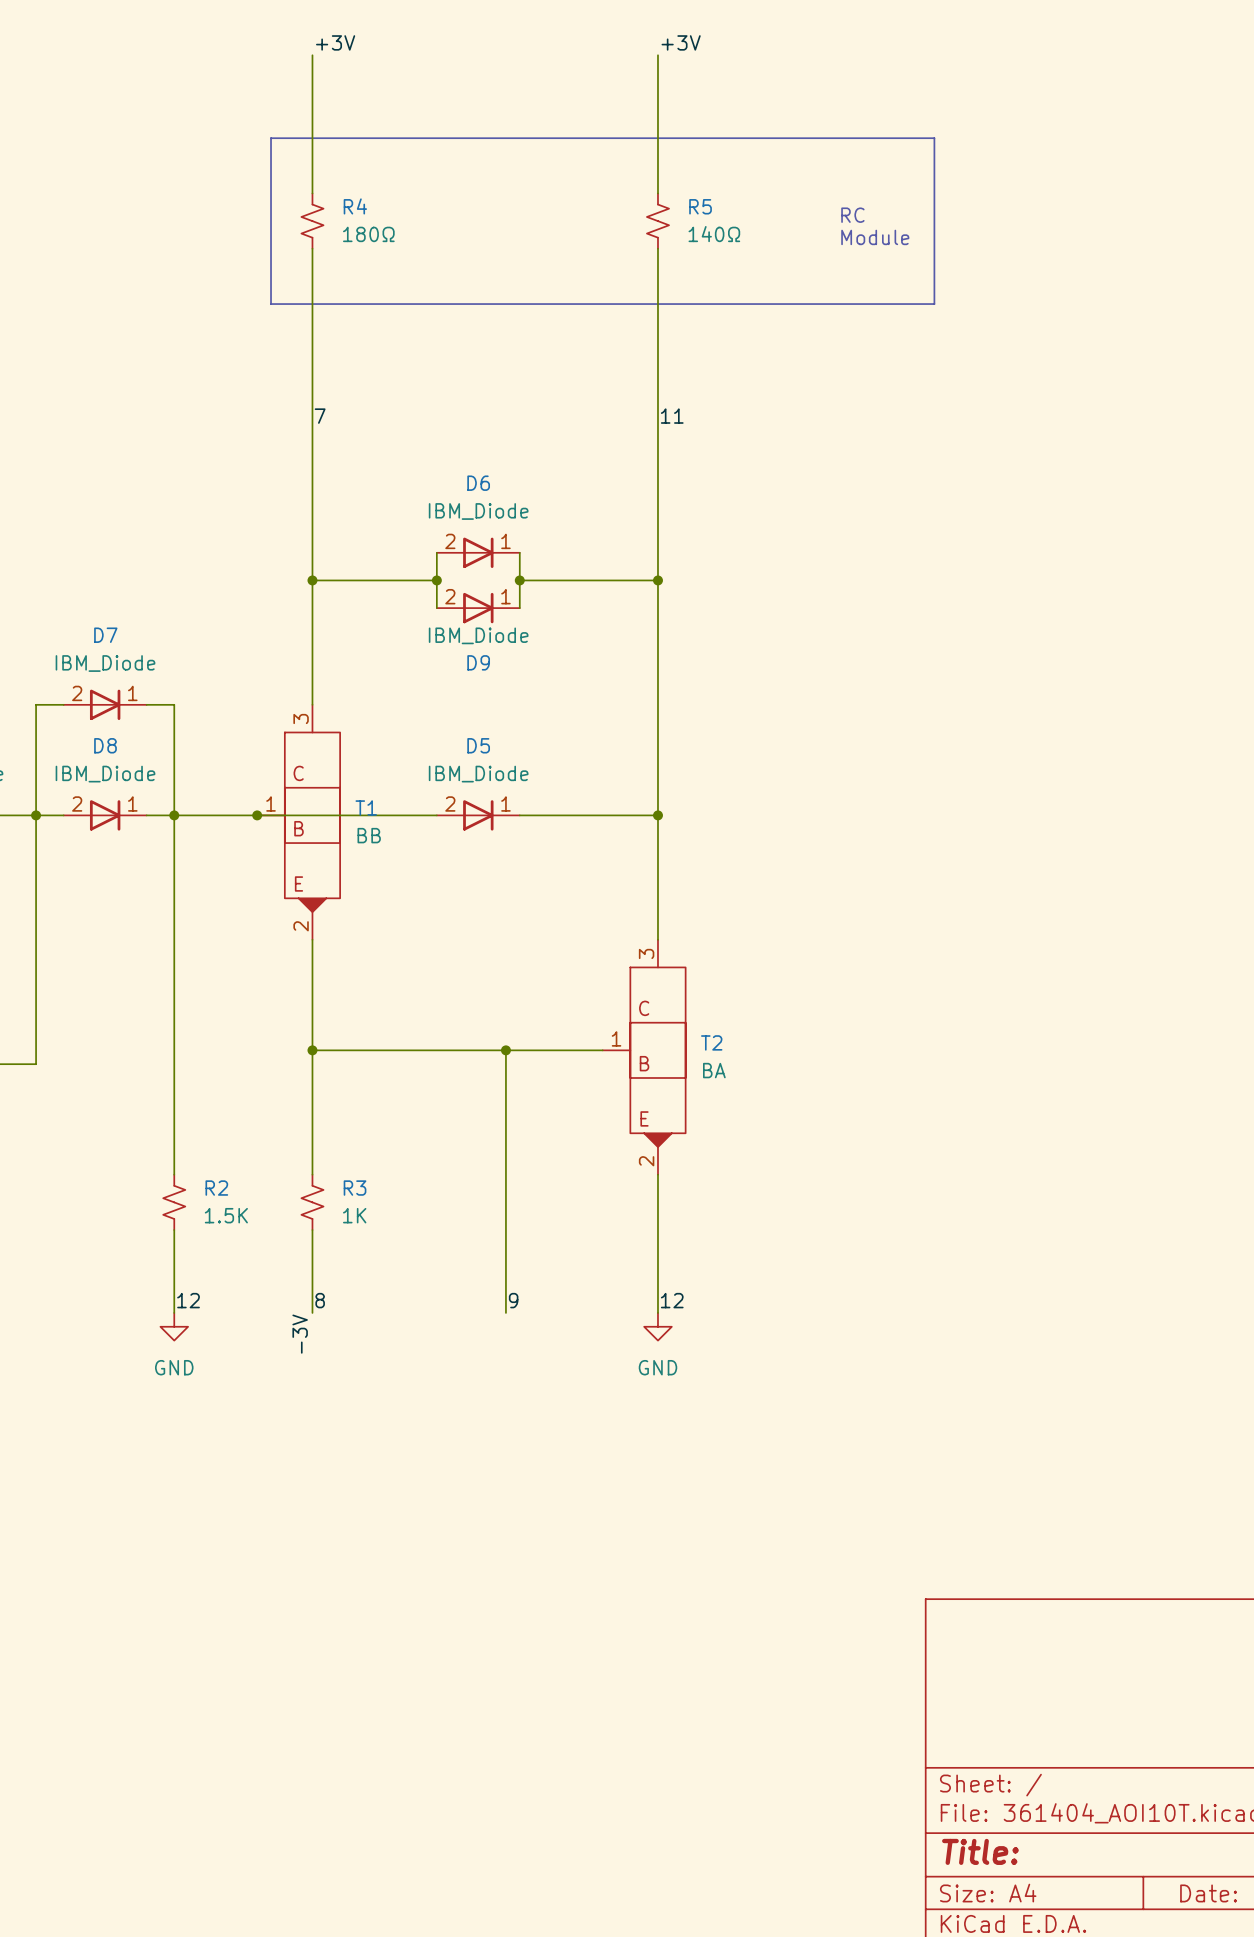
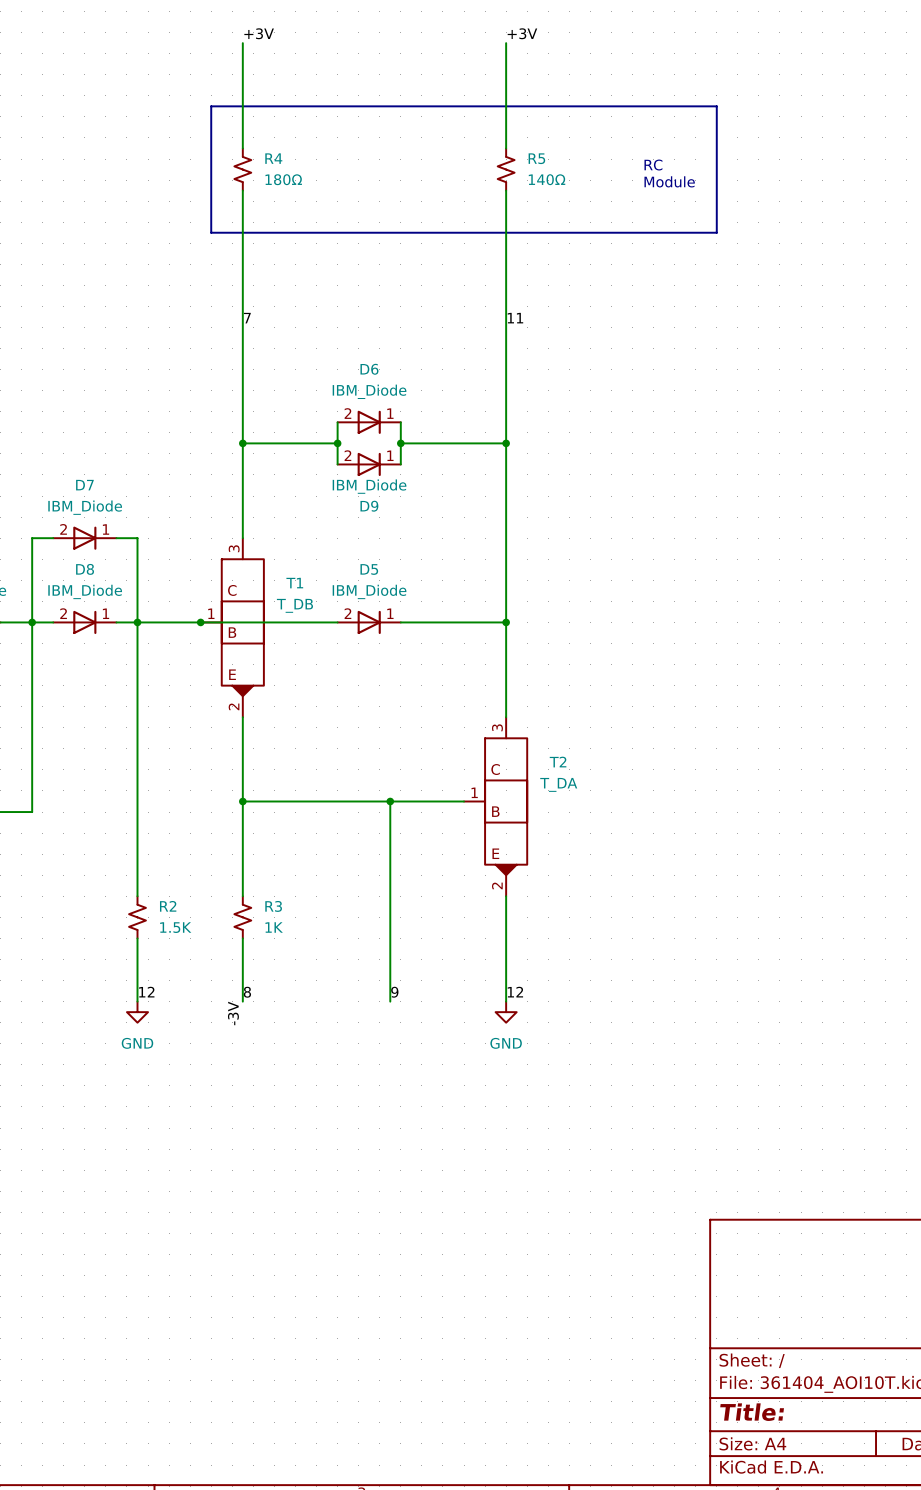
T1 name position: T1 (366, 807) -> T1 (294, 583)
T1 value: BB (369, 835) -> T_DB (294, 605)
T2 name position: T2 (711, 1042) -> T2 (558, 762)
T2 value: BA (714, 1070) -> T_DA (558, 784)

